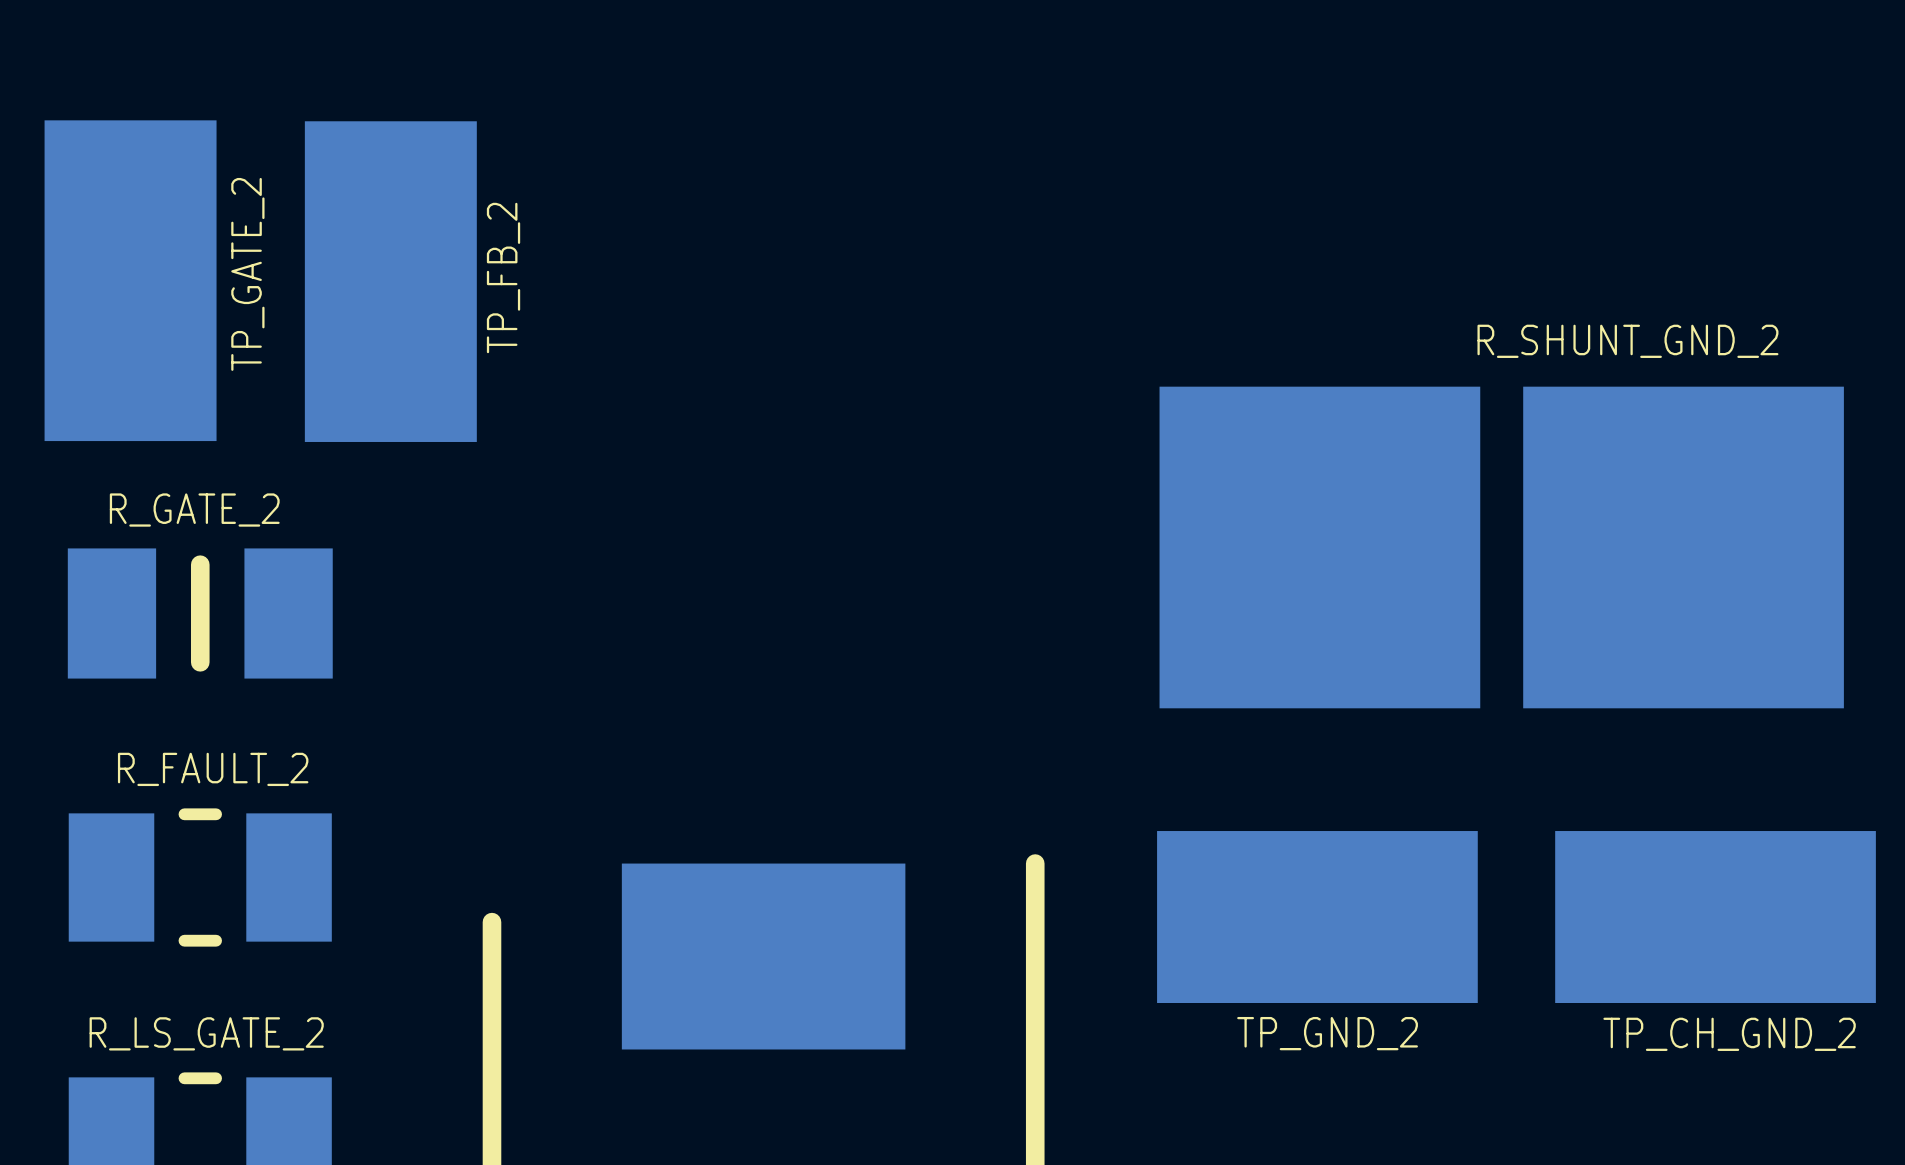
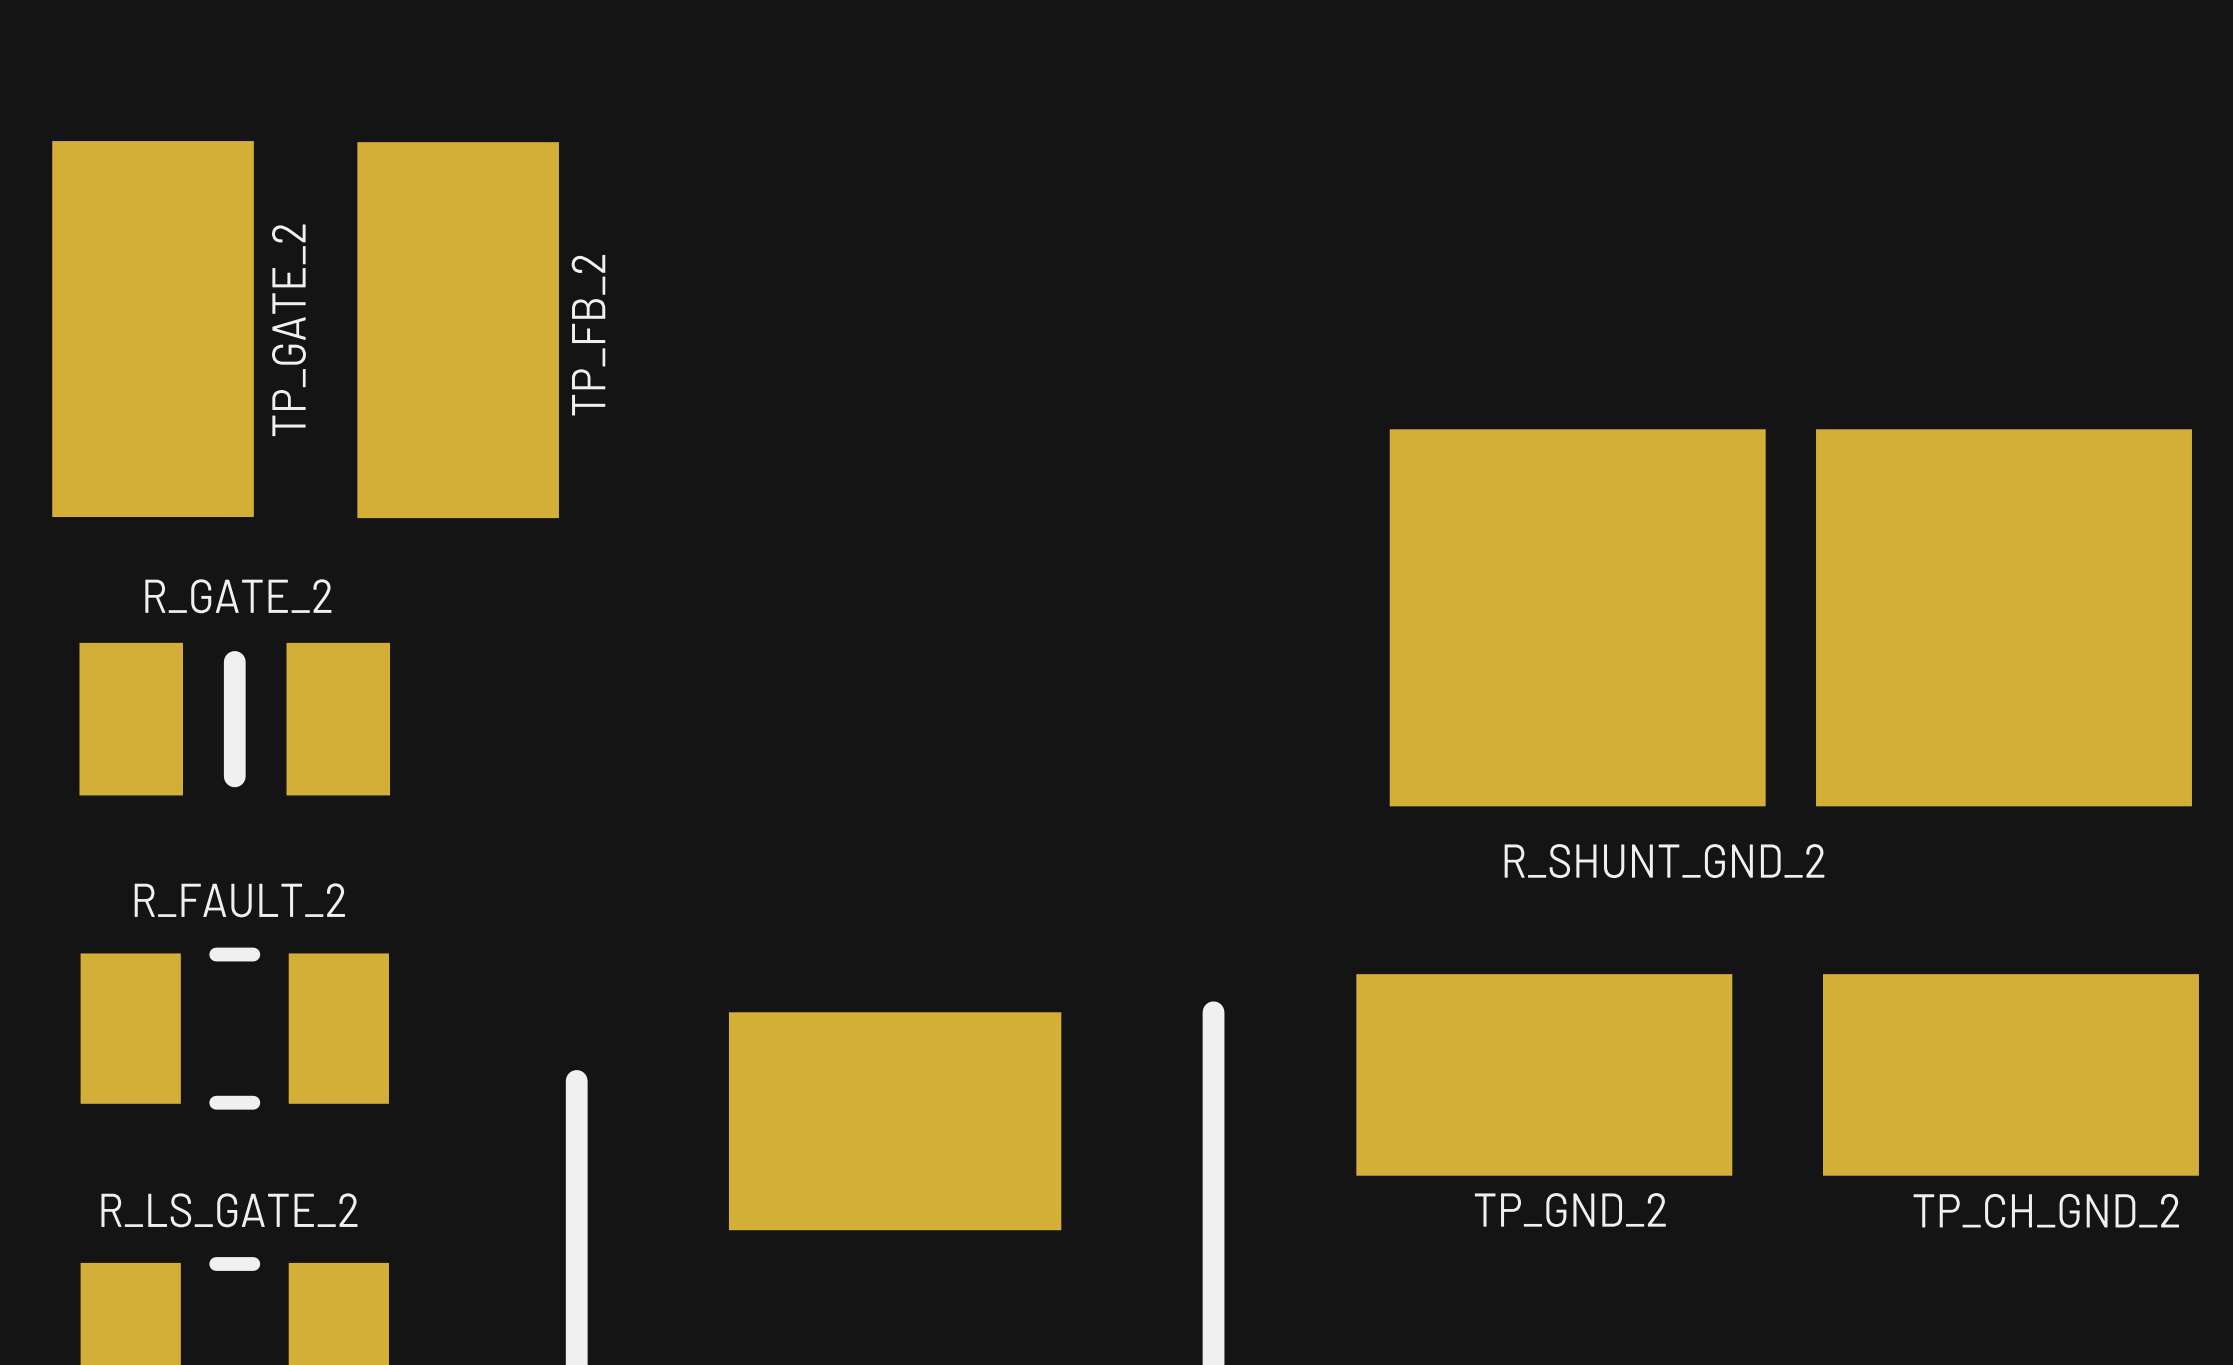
R_SHUNT_GND_2 name position: R_SHUNT_GND_2 (1627, 341) -> R_SHUNT_GND_2 (1664, 861)
R_SHUNT_GND_2 position: (1501, 547) -> (1790, 617)

